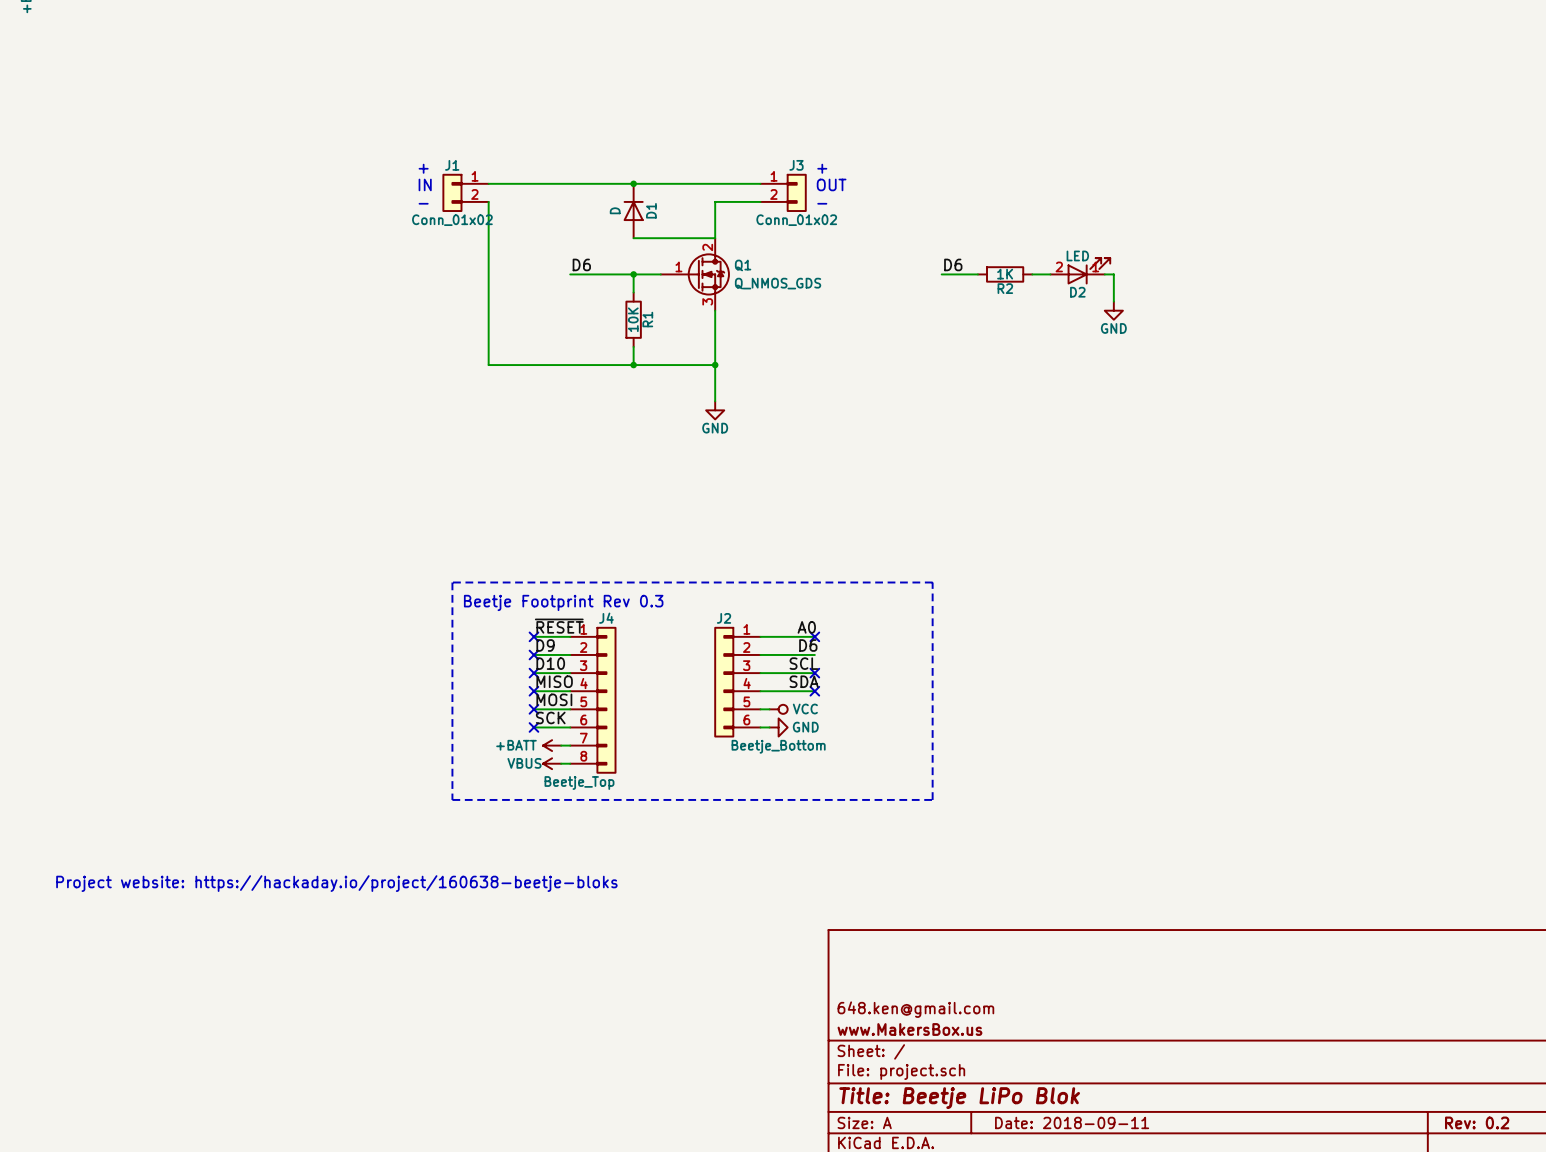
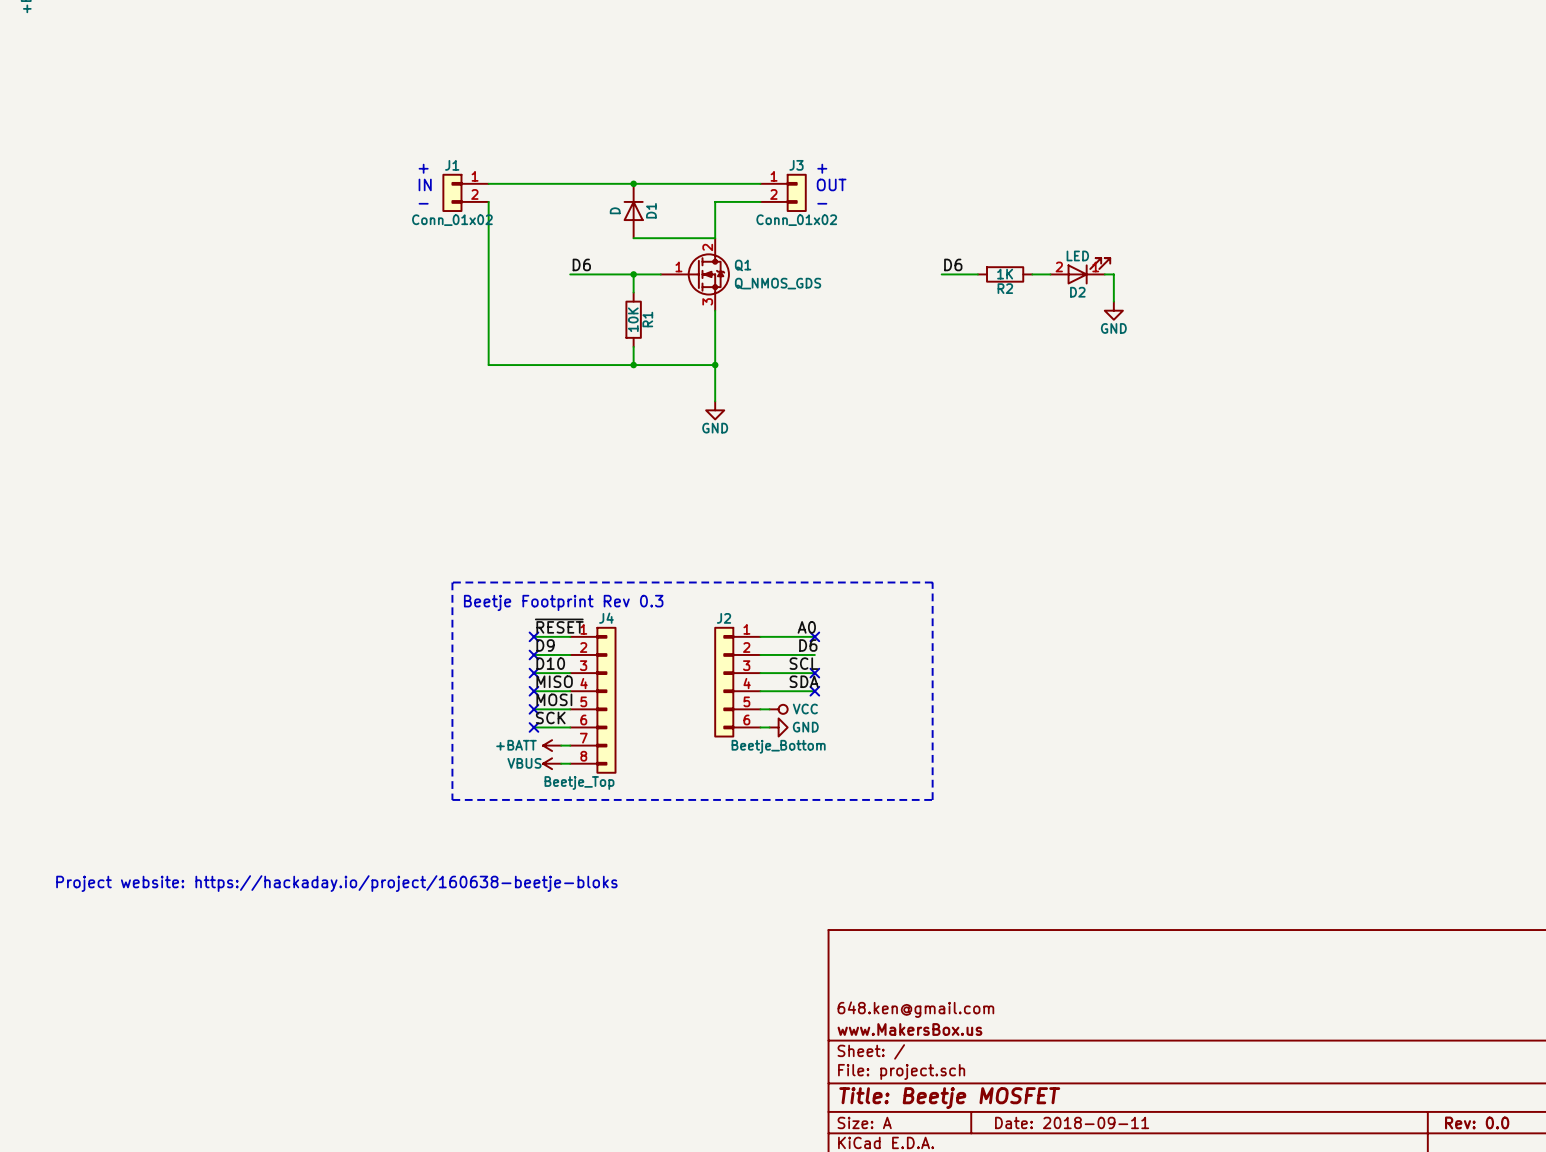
title block: Title: Beetje LiPo Blok (959, 1098) -> Title: Beetje MOSFET (949, 1098)
title block: Rev: 0.2 (1477, 1122) -> Rev: 0.0 (1477, 1122)

